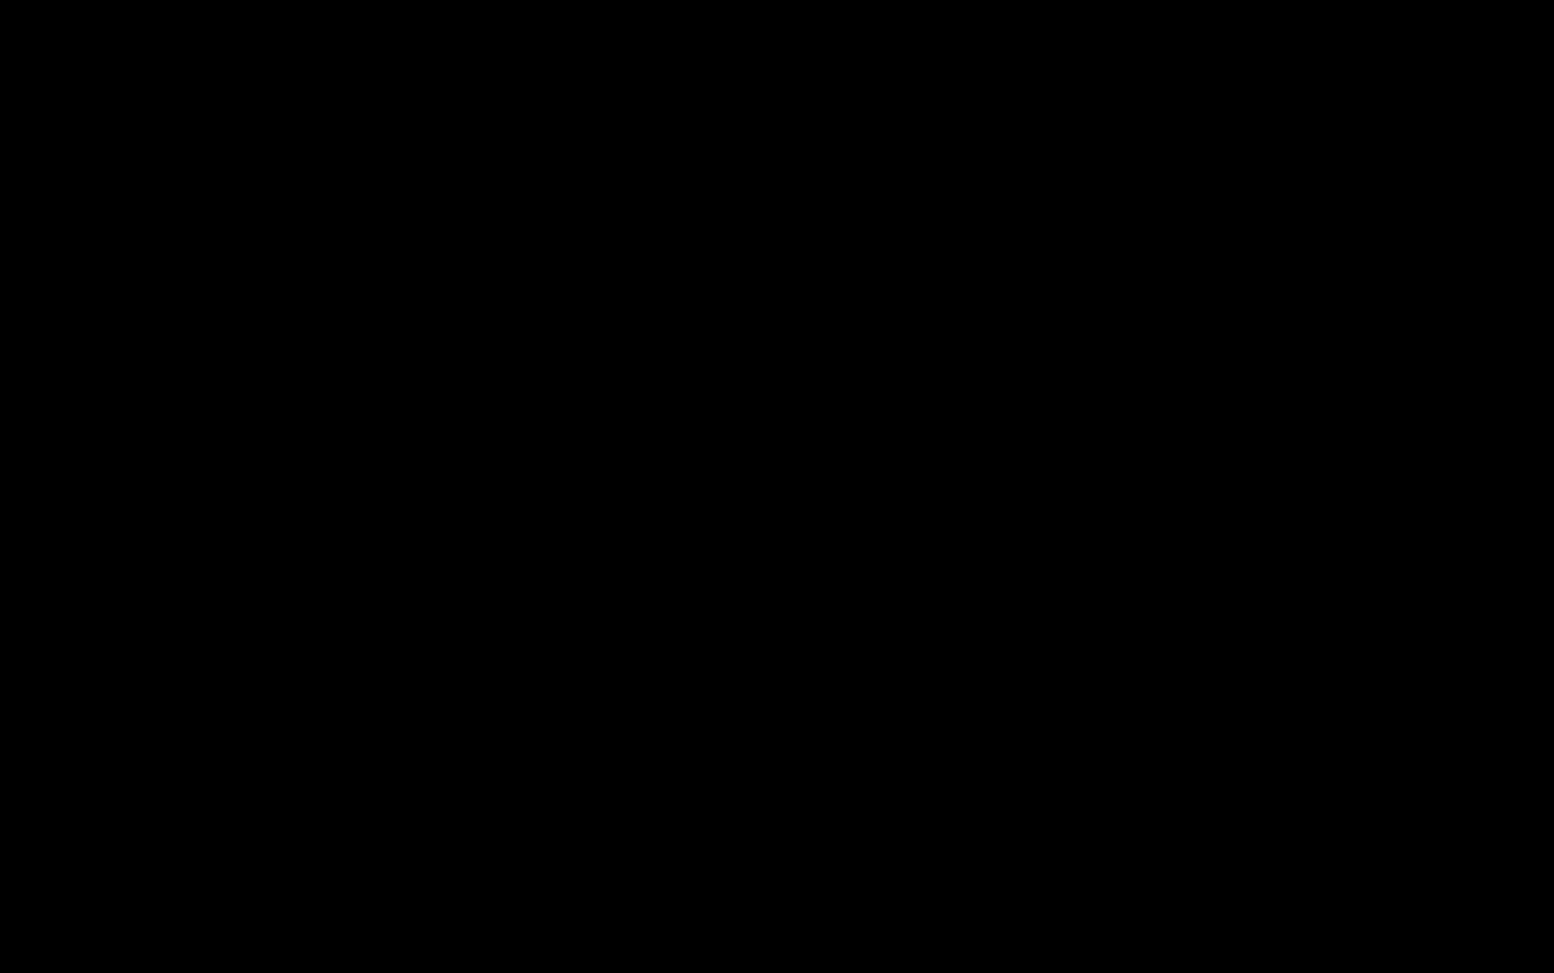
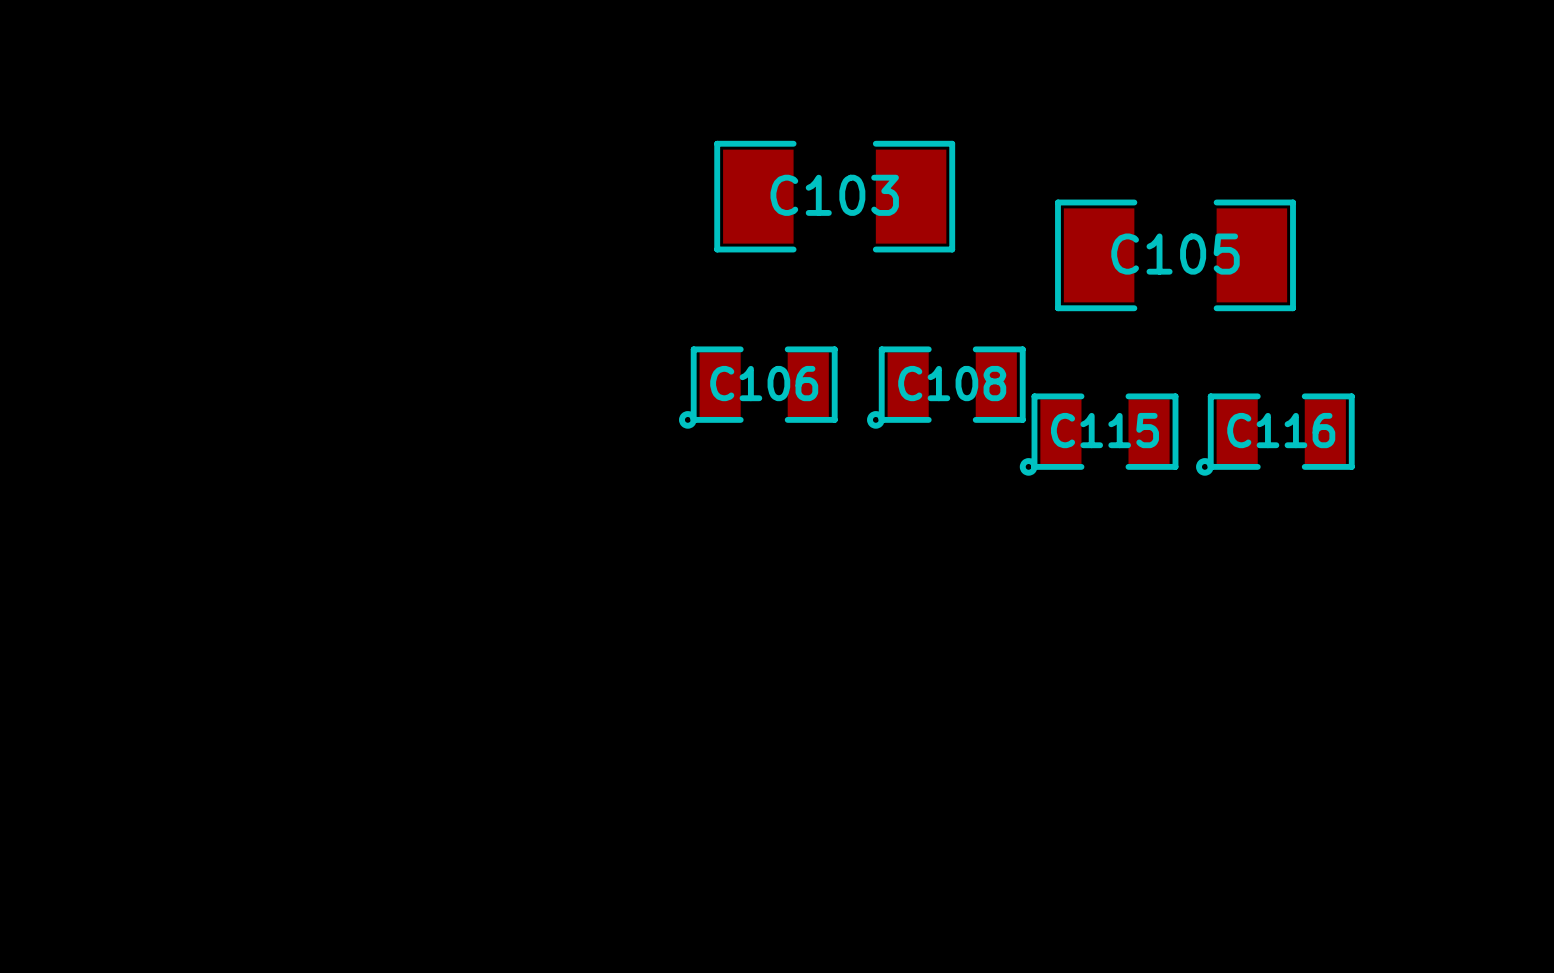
C103: none -> (834, 196)
C105: none -> (1175, 255)
C106: none -> (758, 387)
C108: none -> (946, 387)
C115: none -> (1099, 434)
C116: none -> (1275, 434)

